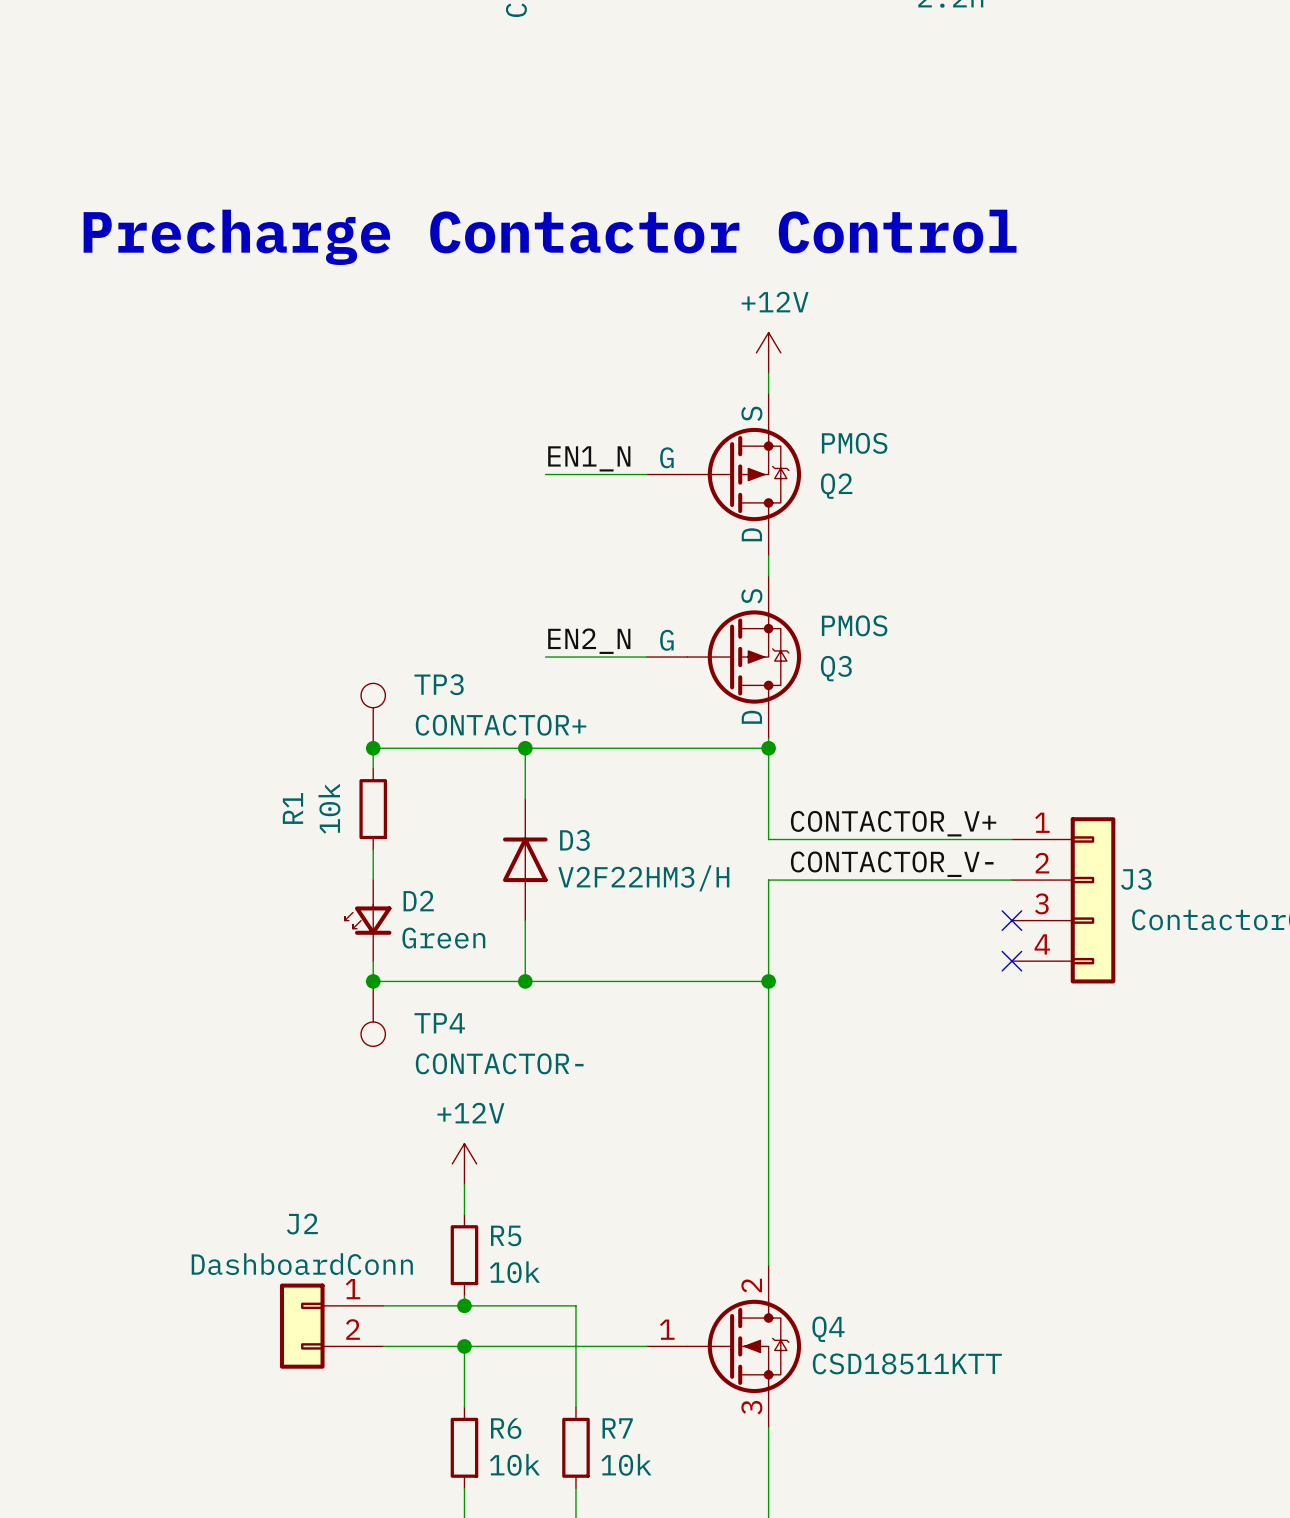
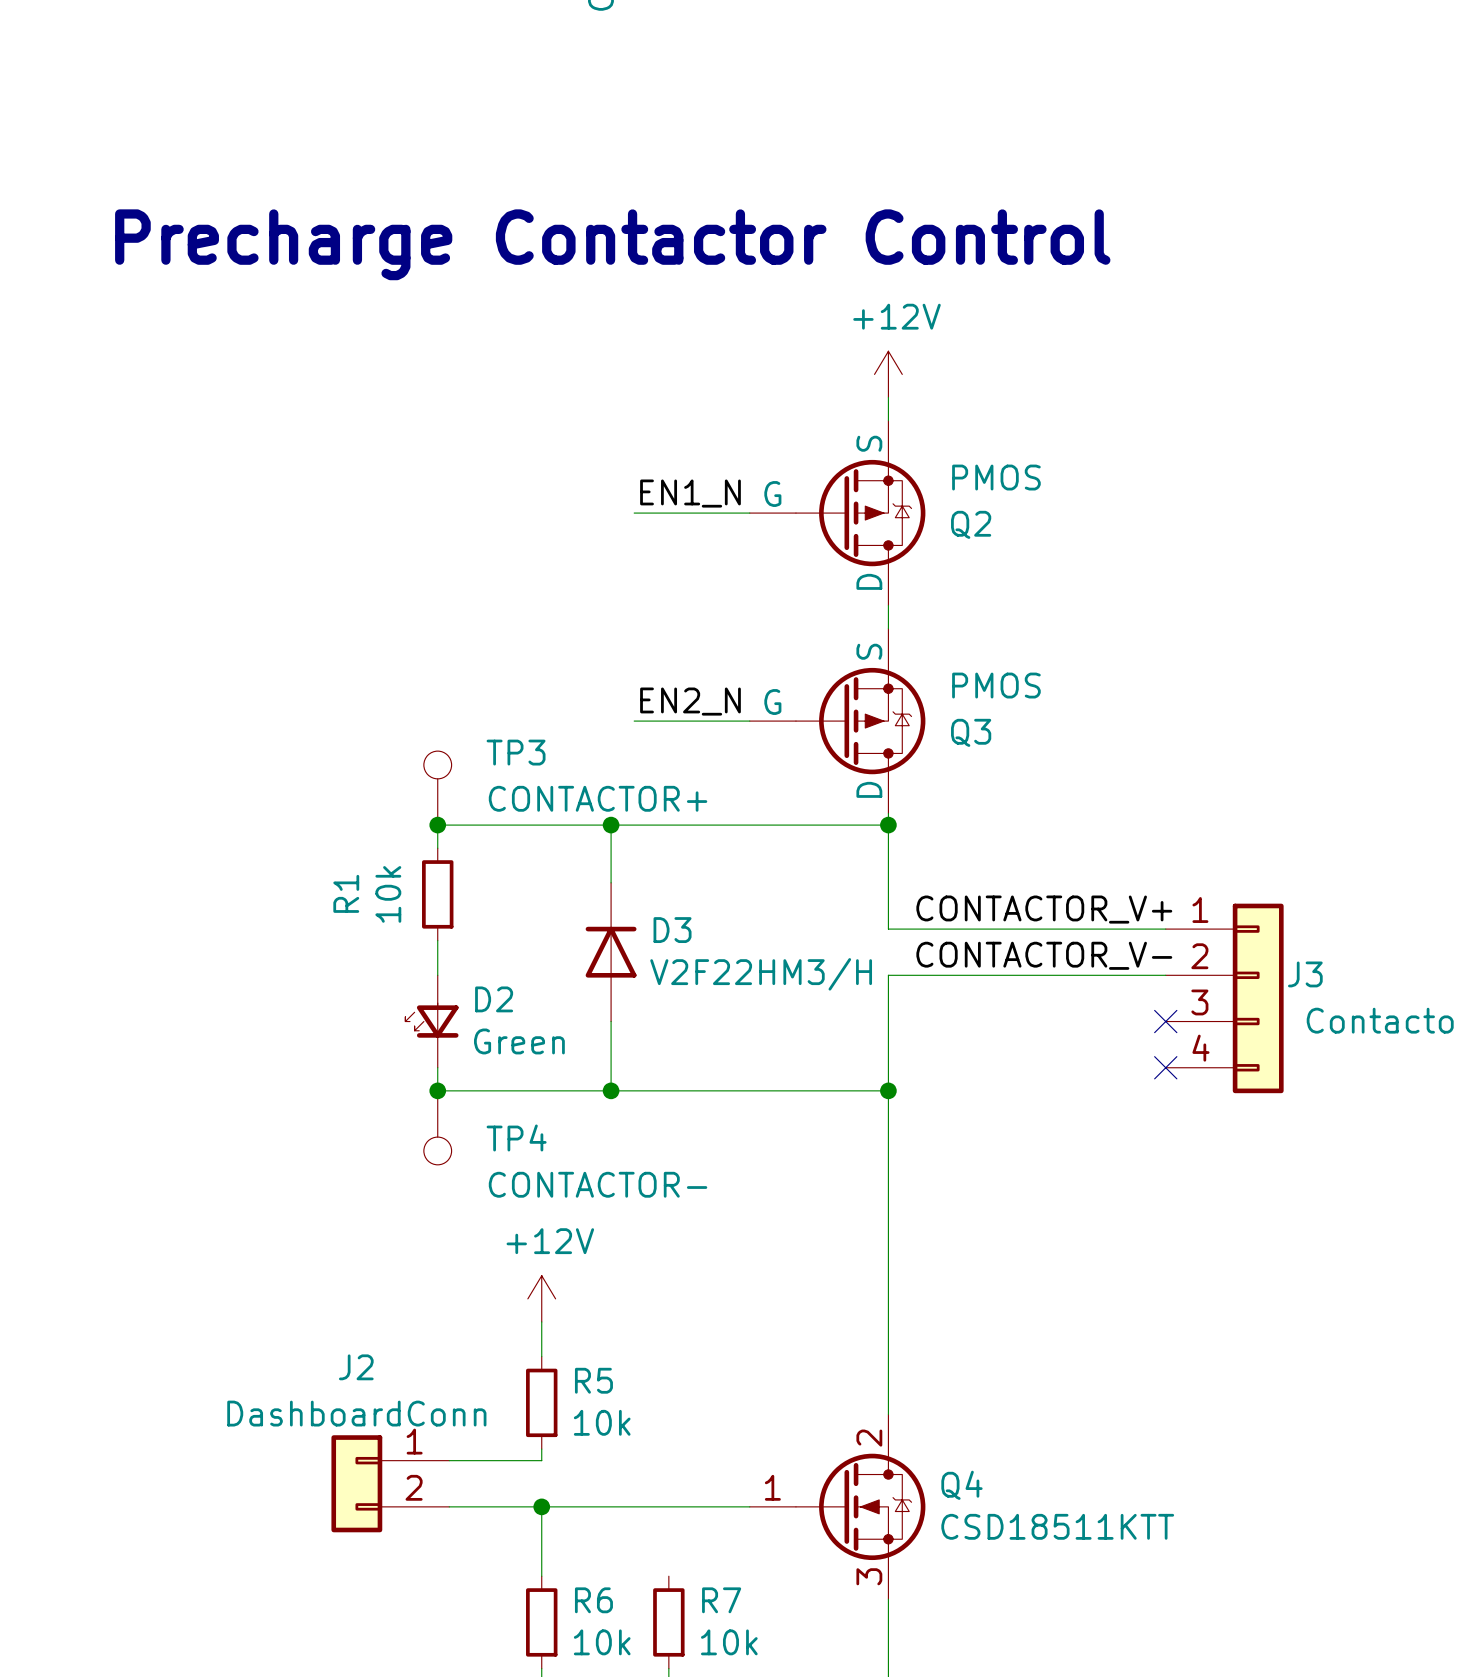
wire: (464, 1305) (575, 1305) (575, 1407) -> none
junction: (464, 1305) -> none

